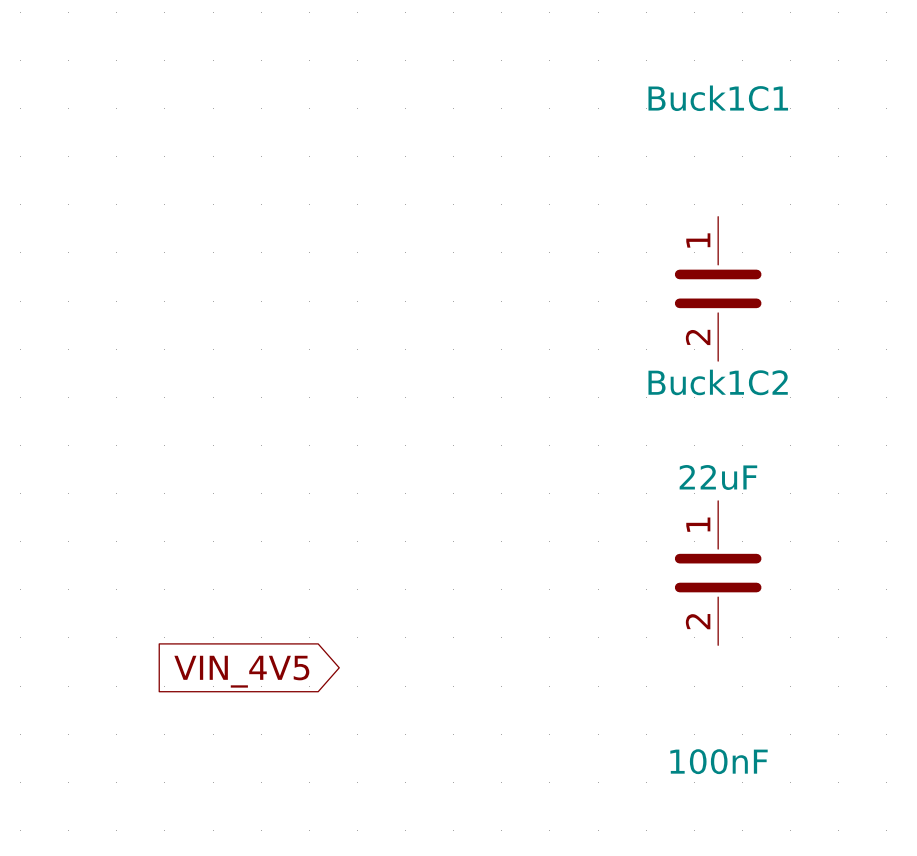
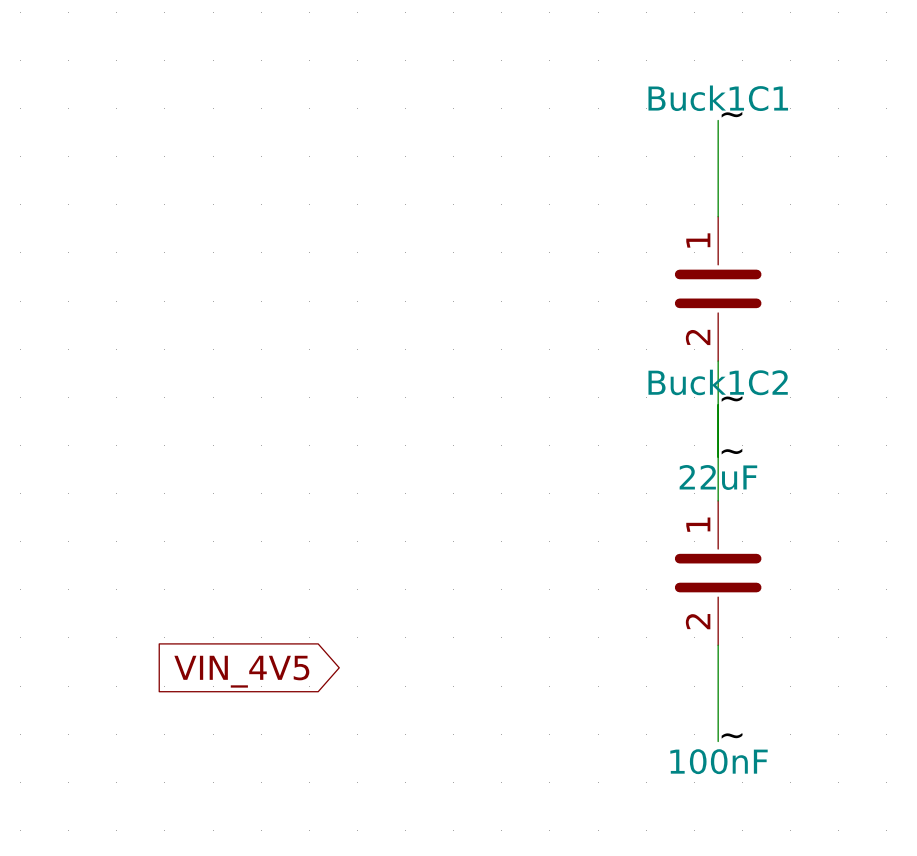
label: none -> ~ (731, 114)
wire: none -> (718, 120) (718, 216)
wire: none -> (718, 361) (718, 500)
label: none -> ~ (731, 398)
label: none -> ~ (731, 451)
wire: none -> (718, 645) (718, 741)
label: none -> ~ (731, 735)

